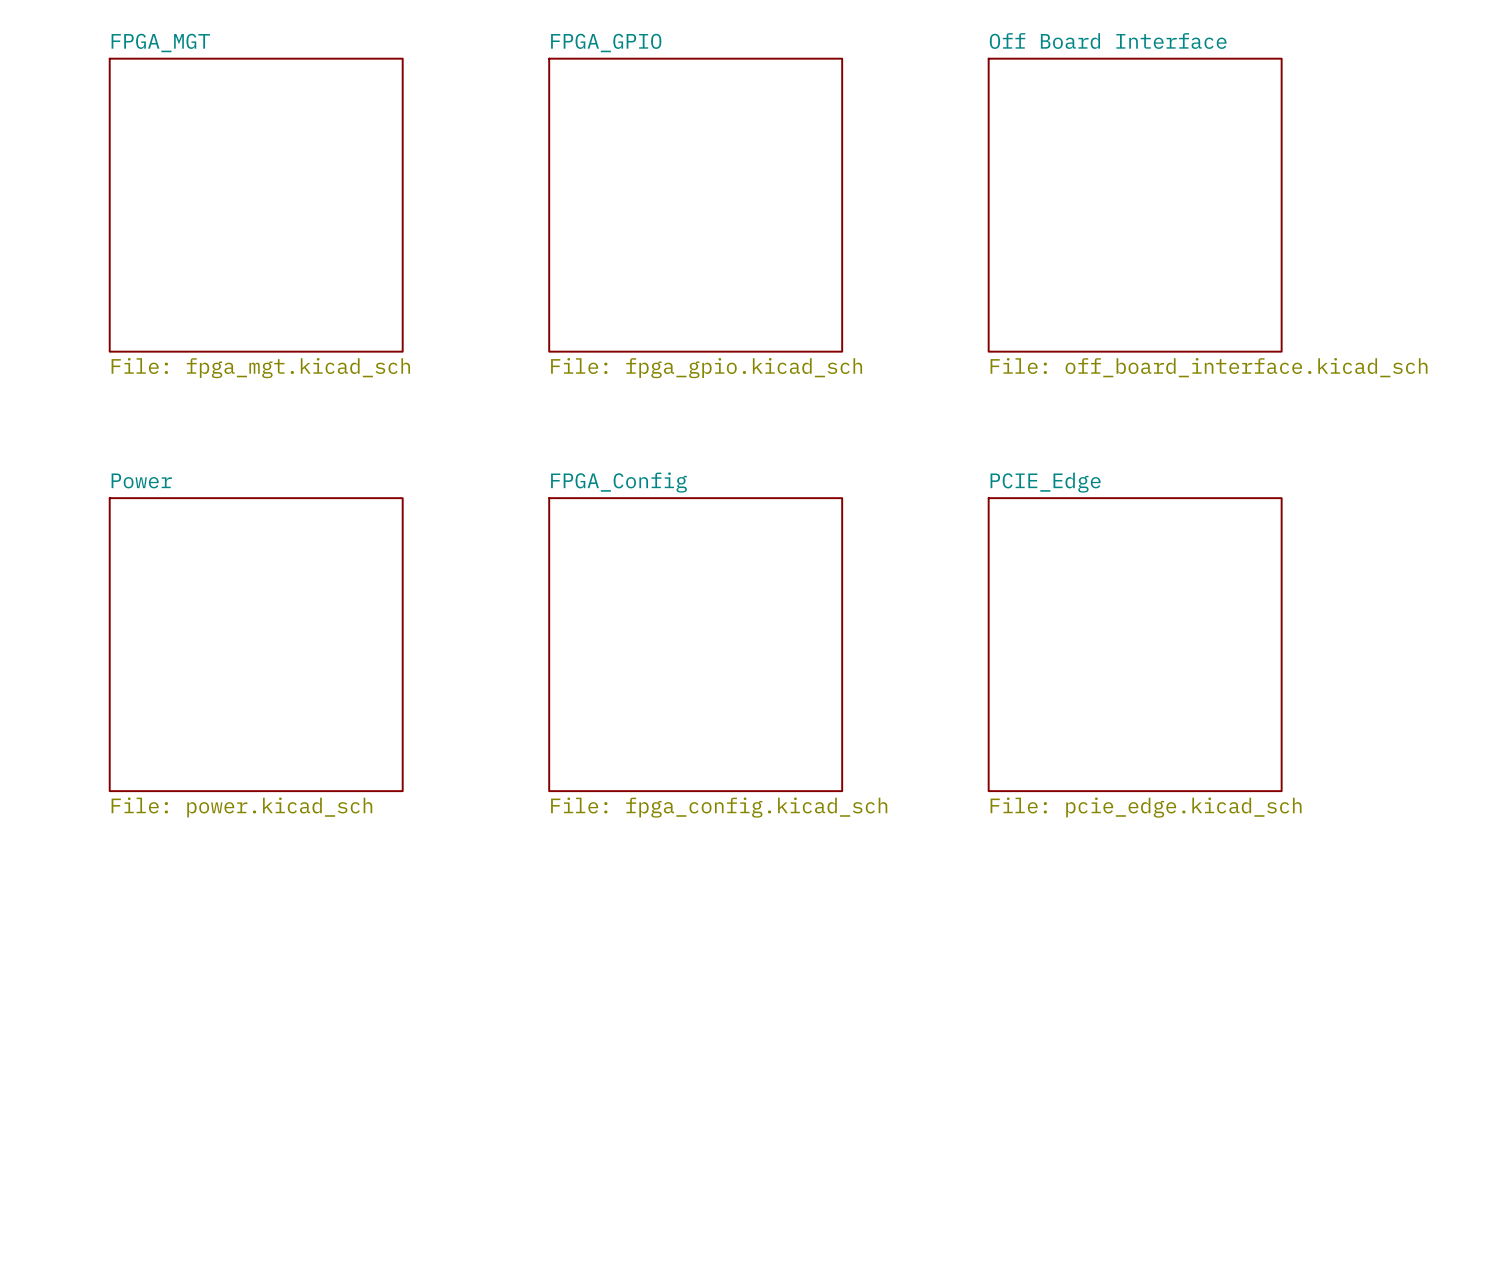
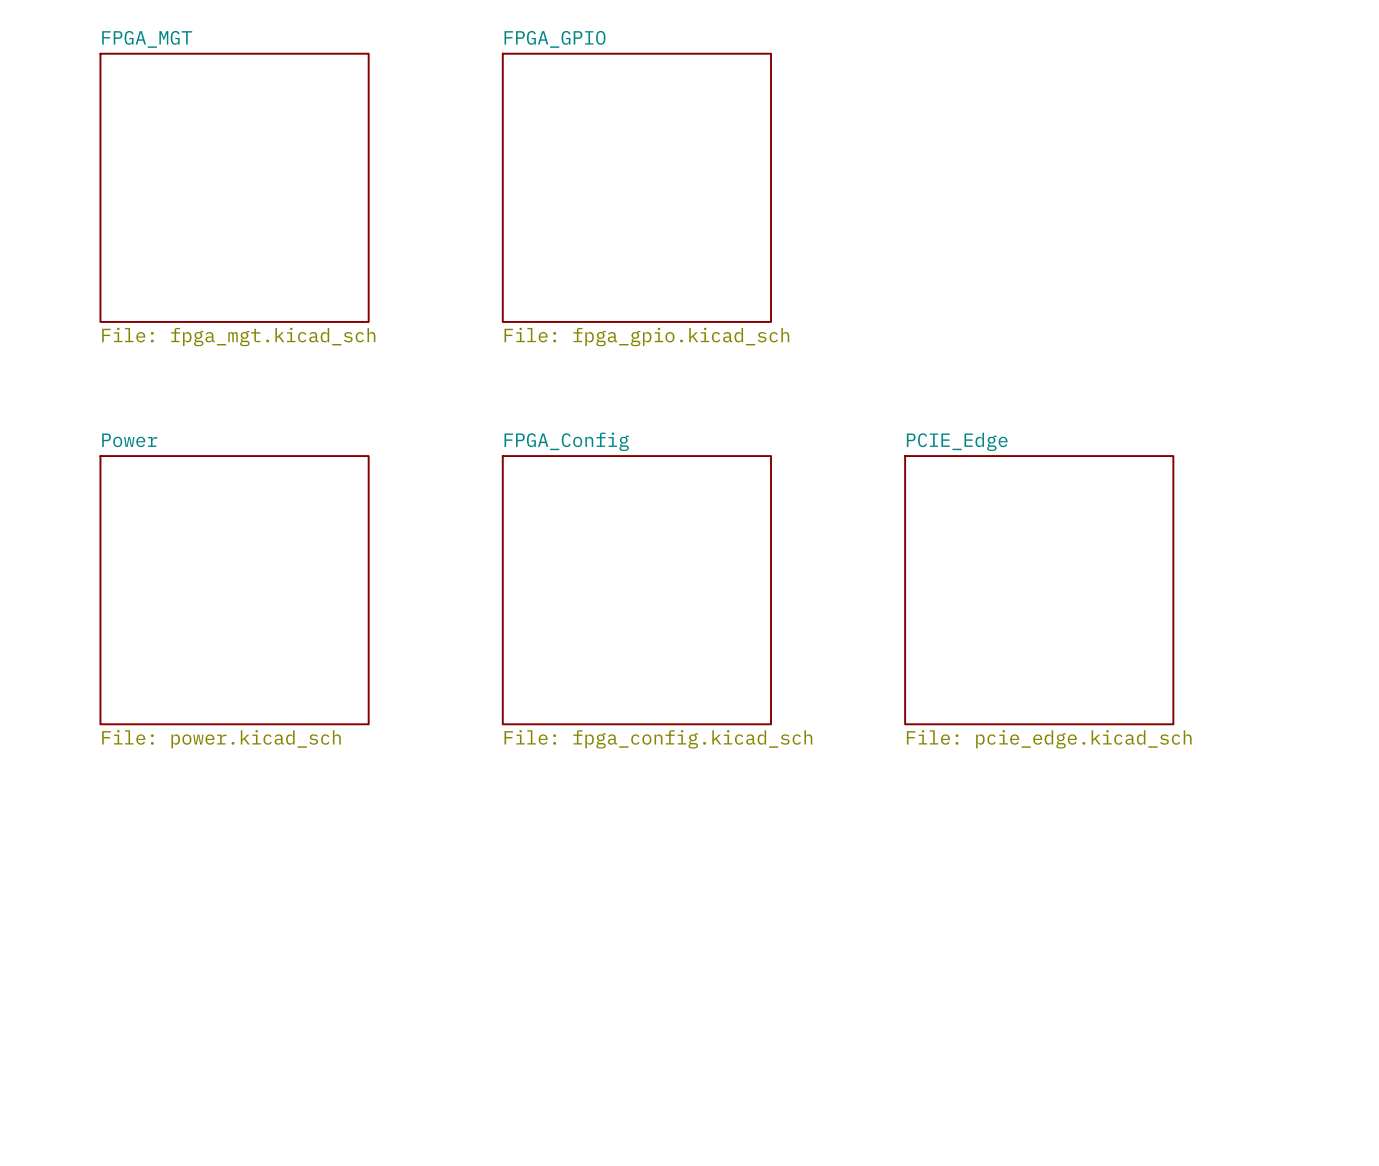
sheet Off Board Interface: File: off_board_interface.kicad_sch (1135, 205) -> none

